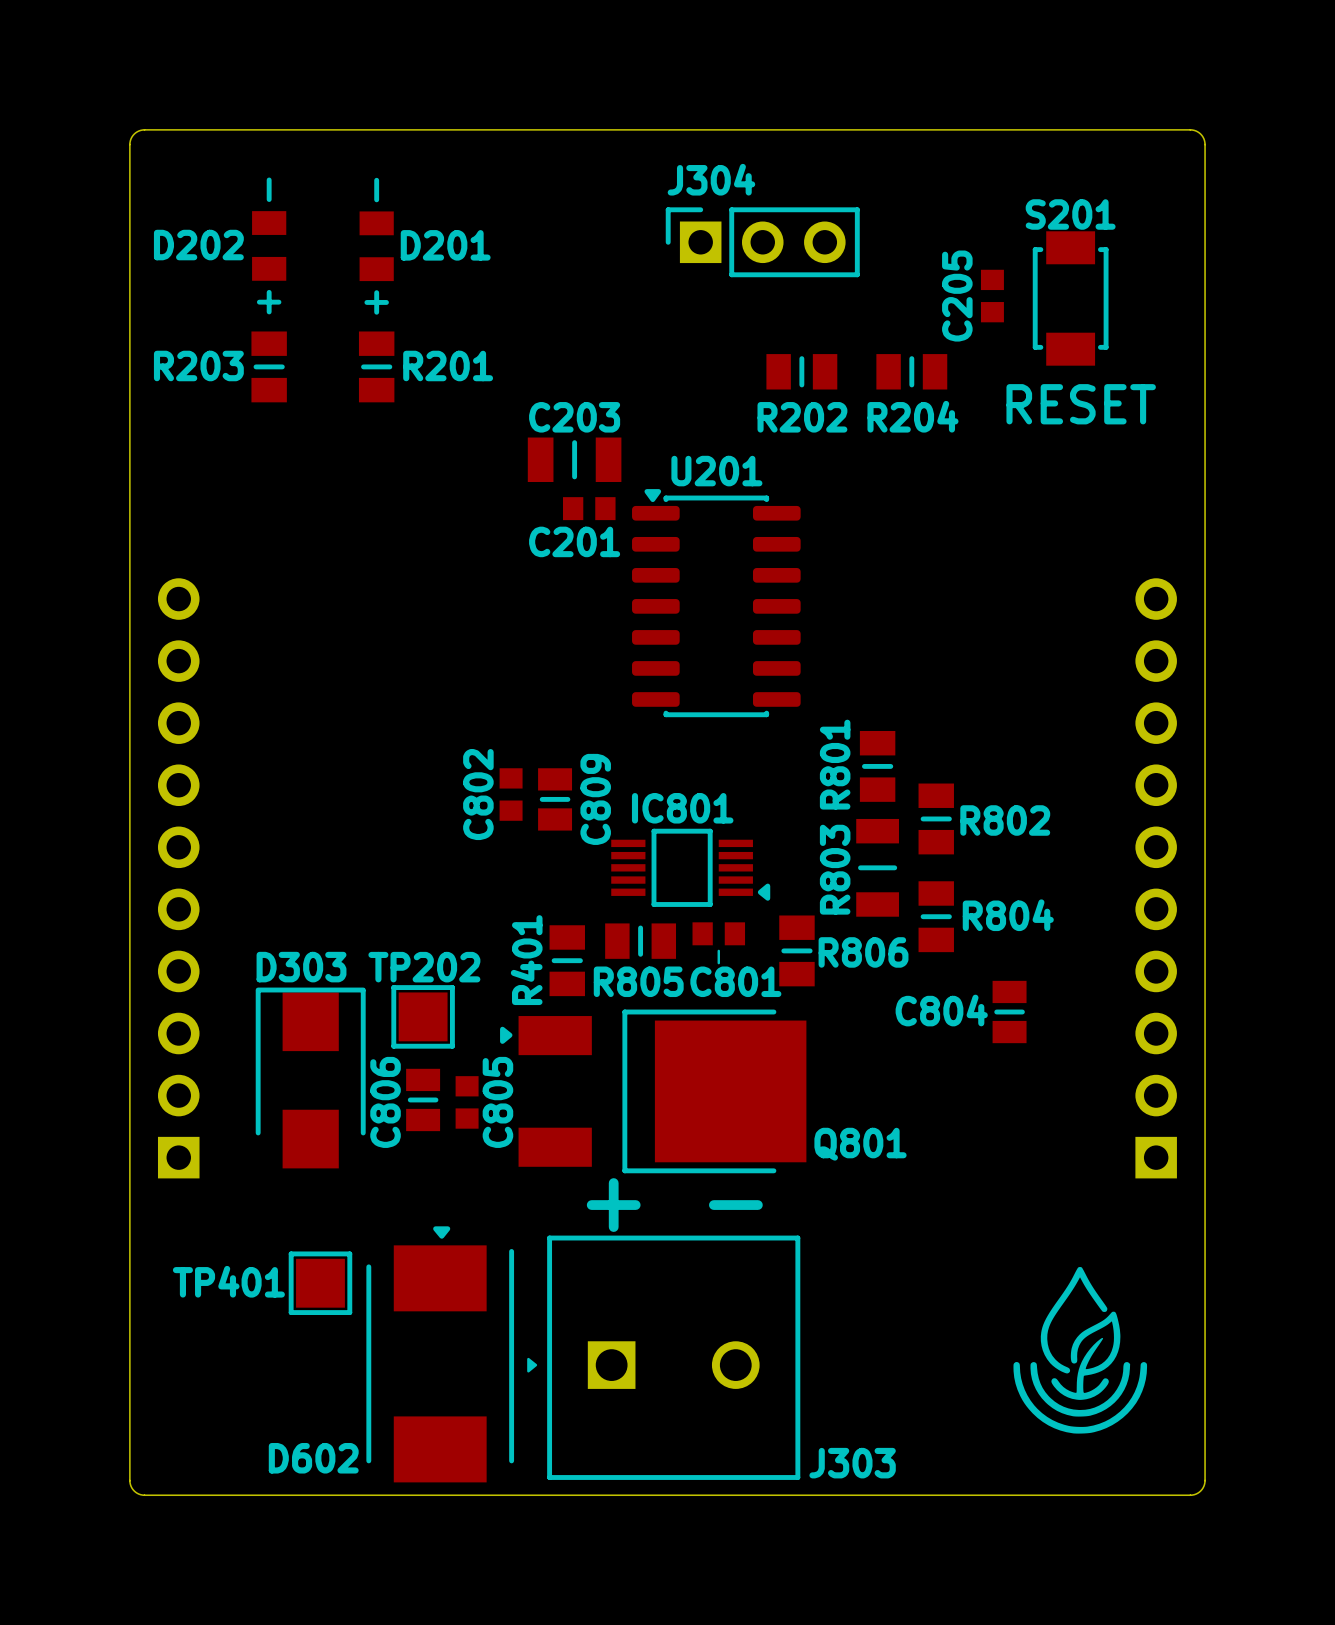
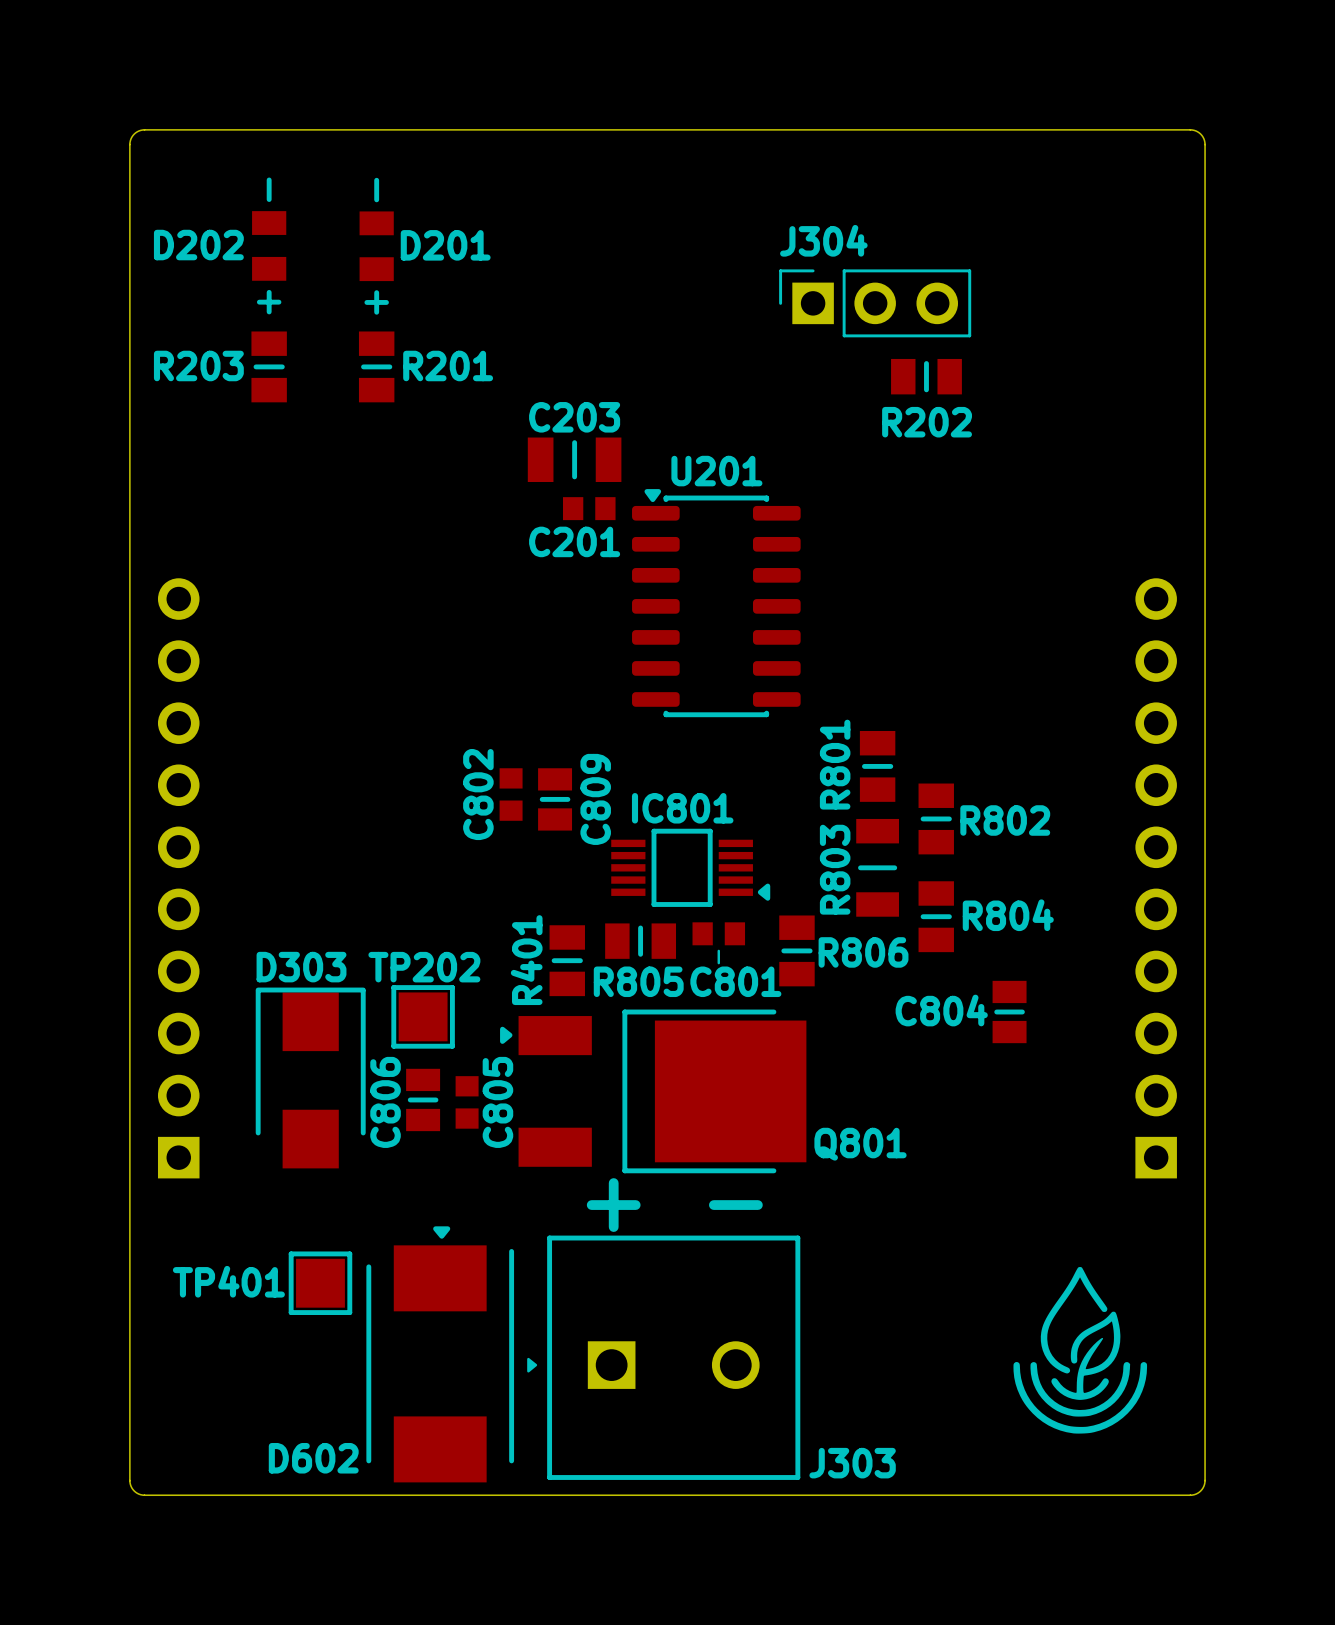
J304 footprint: [665, 207, 860, 278] -> [779, 269, 972, 338]
C205: (992, 296) -> none
S201: (1070, 298) -> none
R202 position: (801, 371) -> (926, 376)
R204: (911, 371) -> none
text: RESET (1081, 404) -> none

